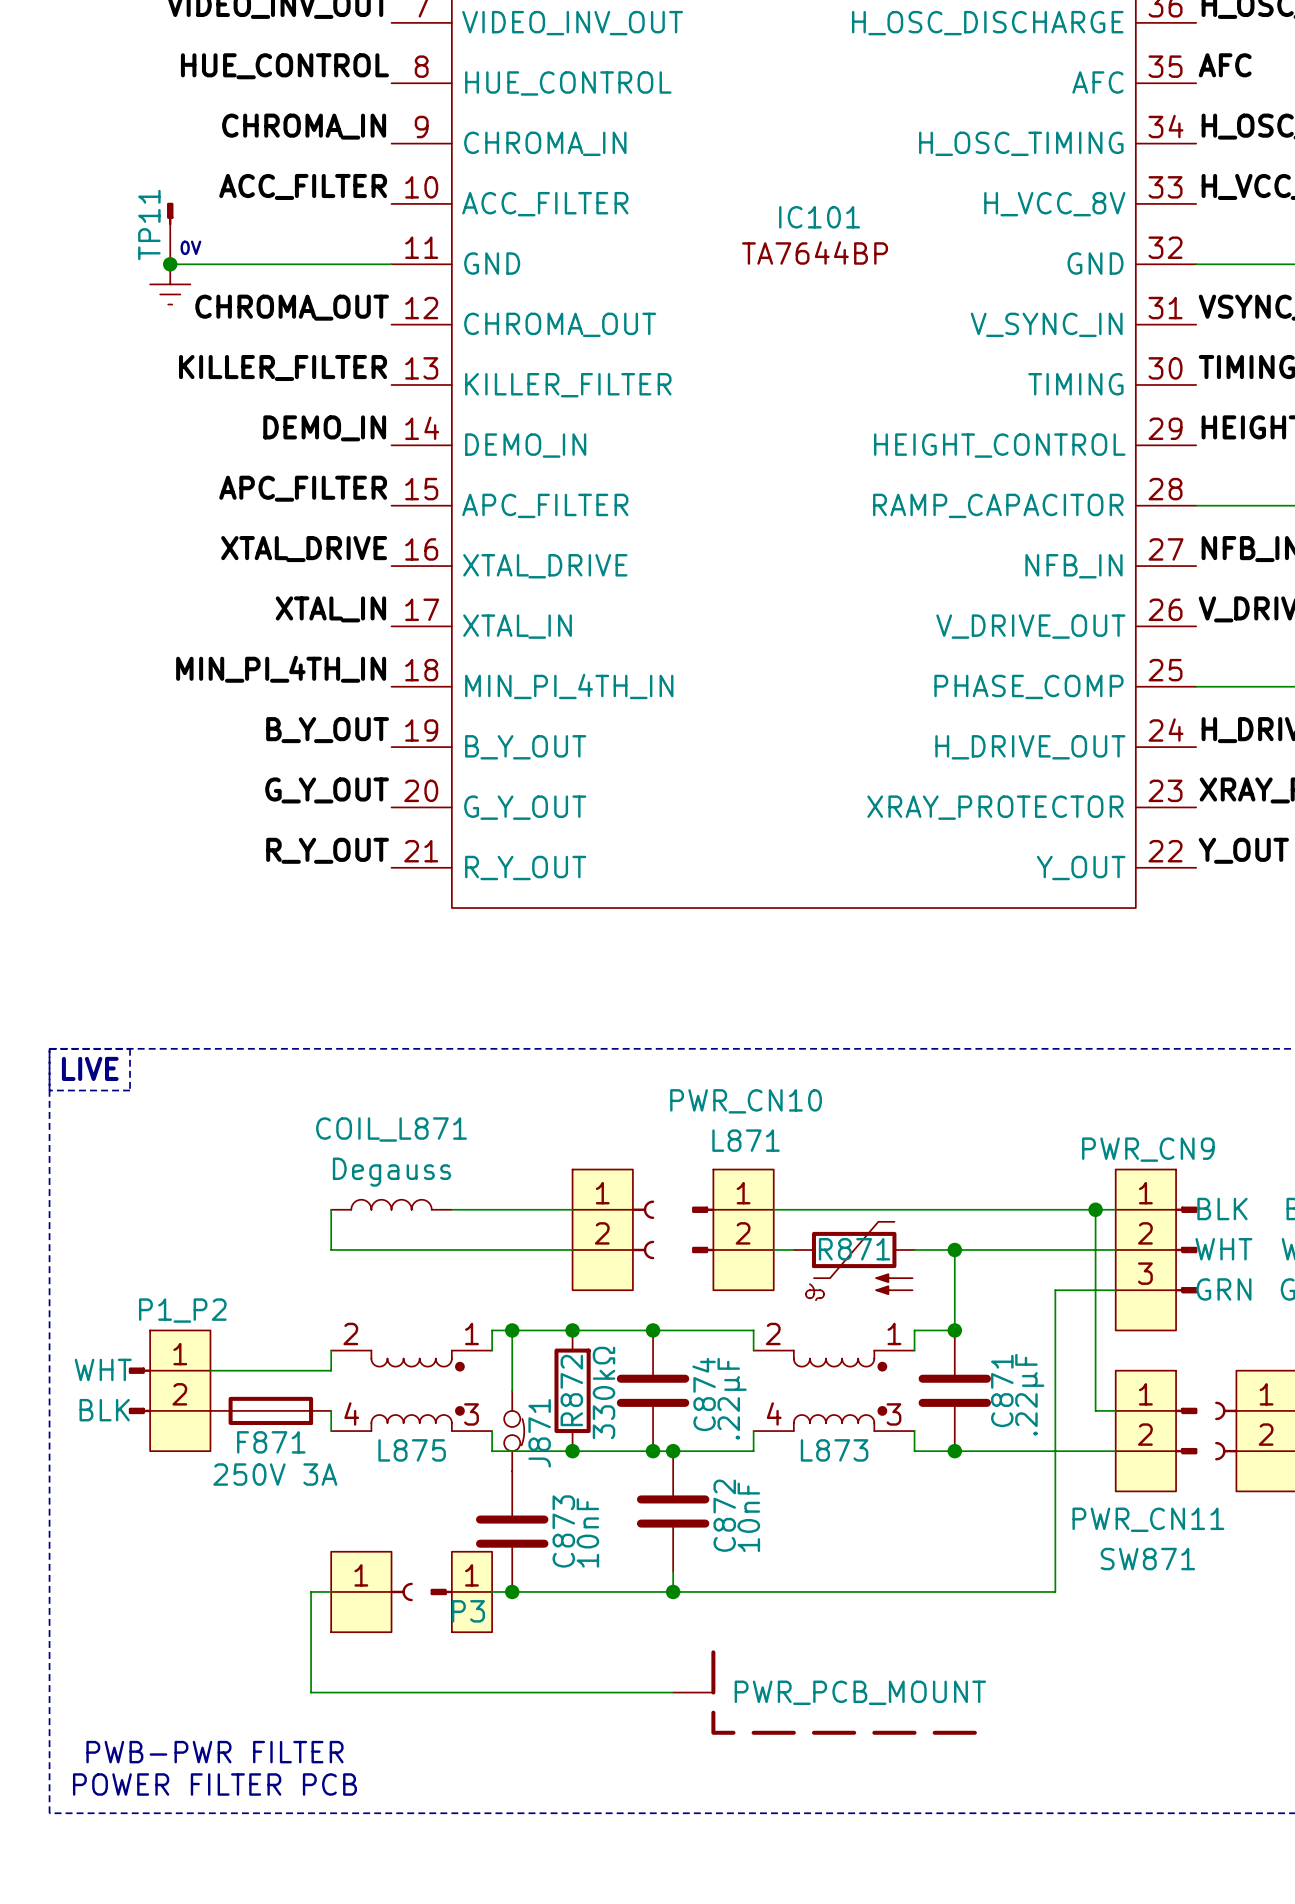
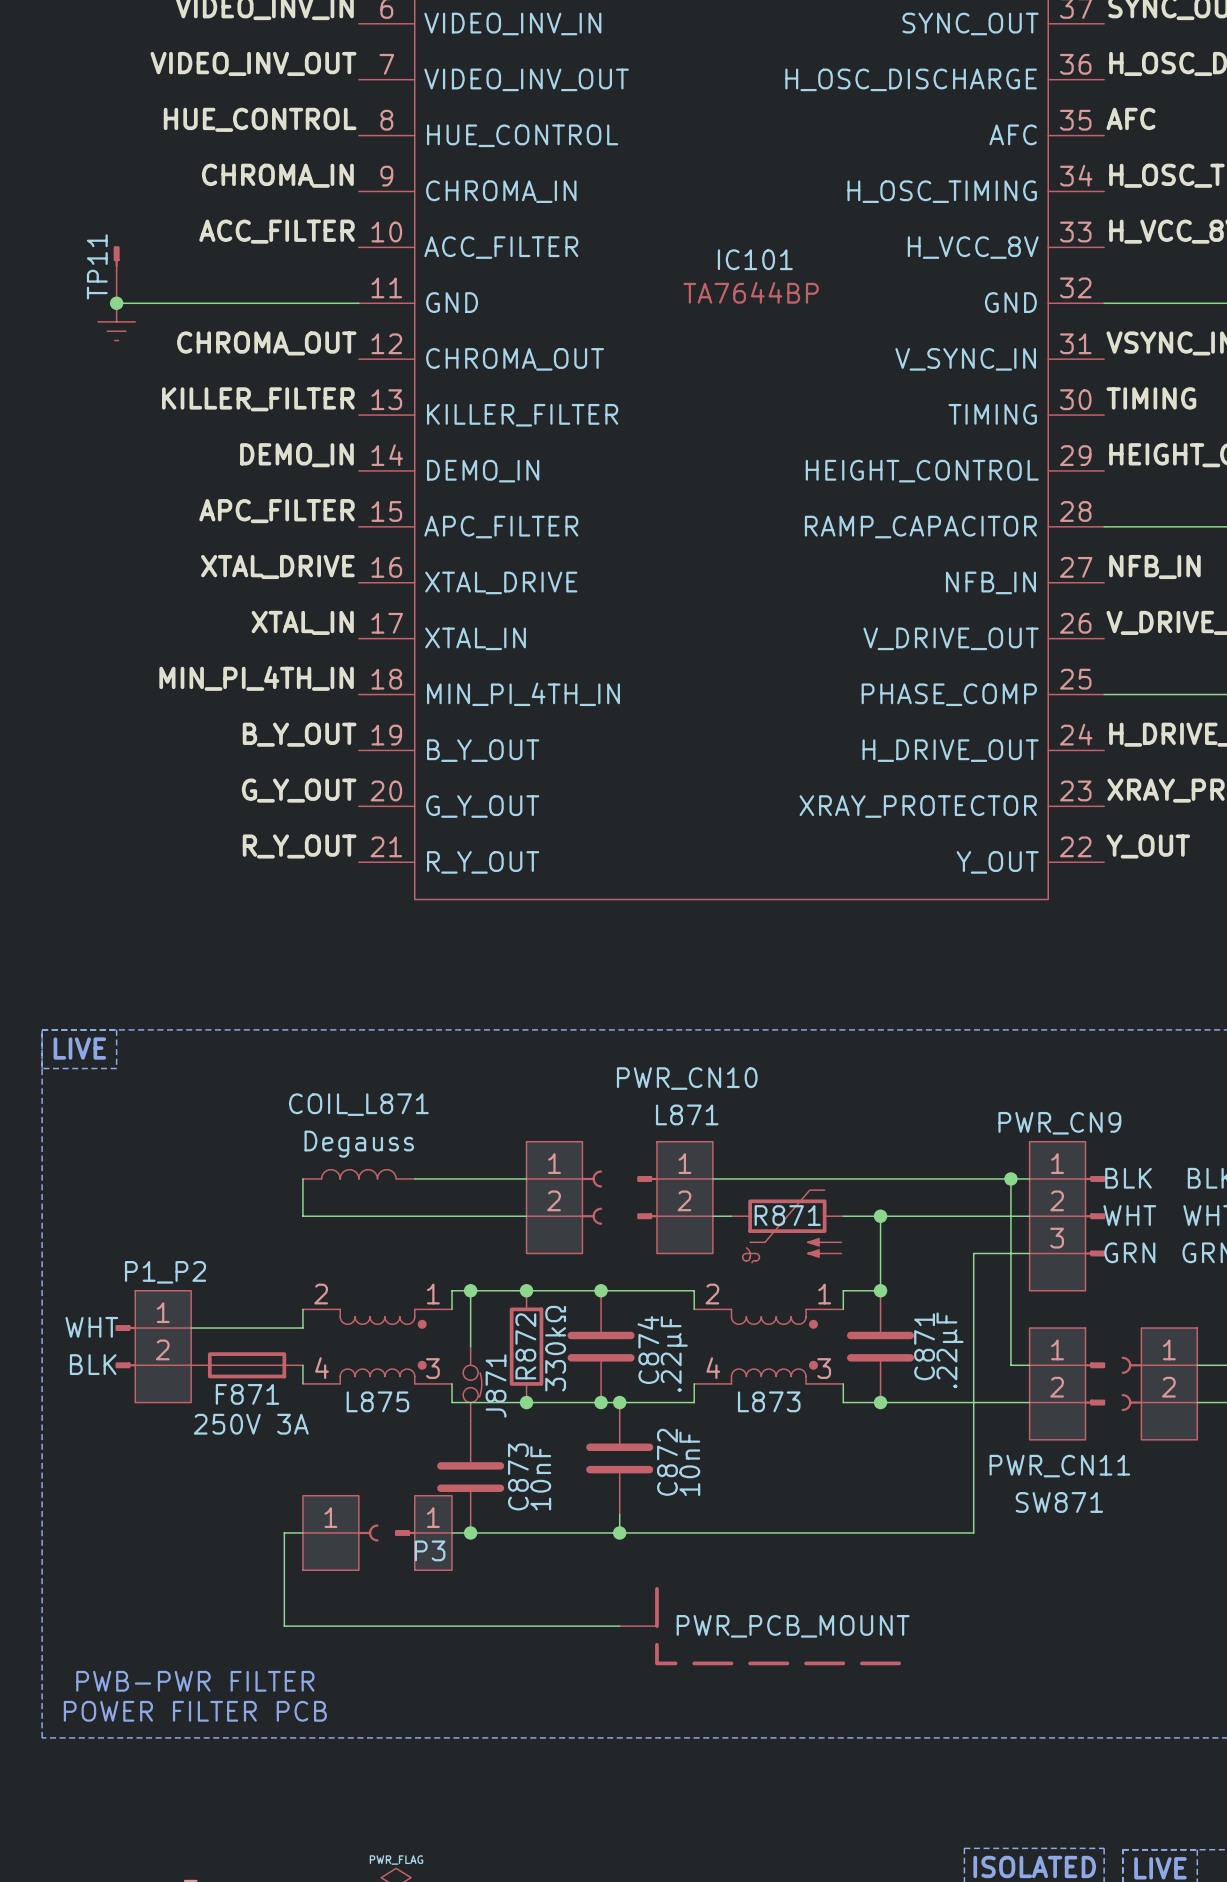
TP11 position: (170, 233) -> (116, 274)
text: 0V (190, 247) -> none
wire: none -> (116, 303) (153, 303)
junction position: (170, 264) -> (116, 303)
power symbol position: (170, 284) -> (116, 321)

